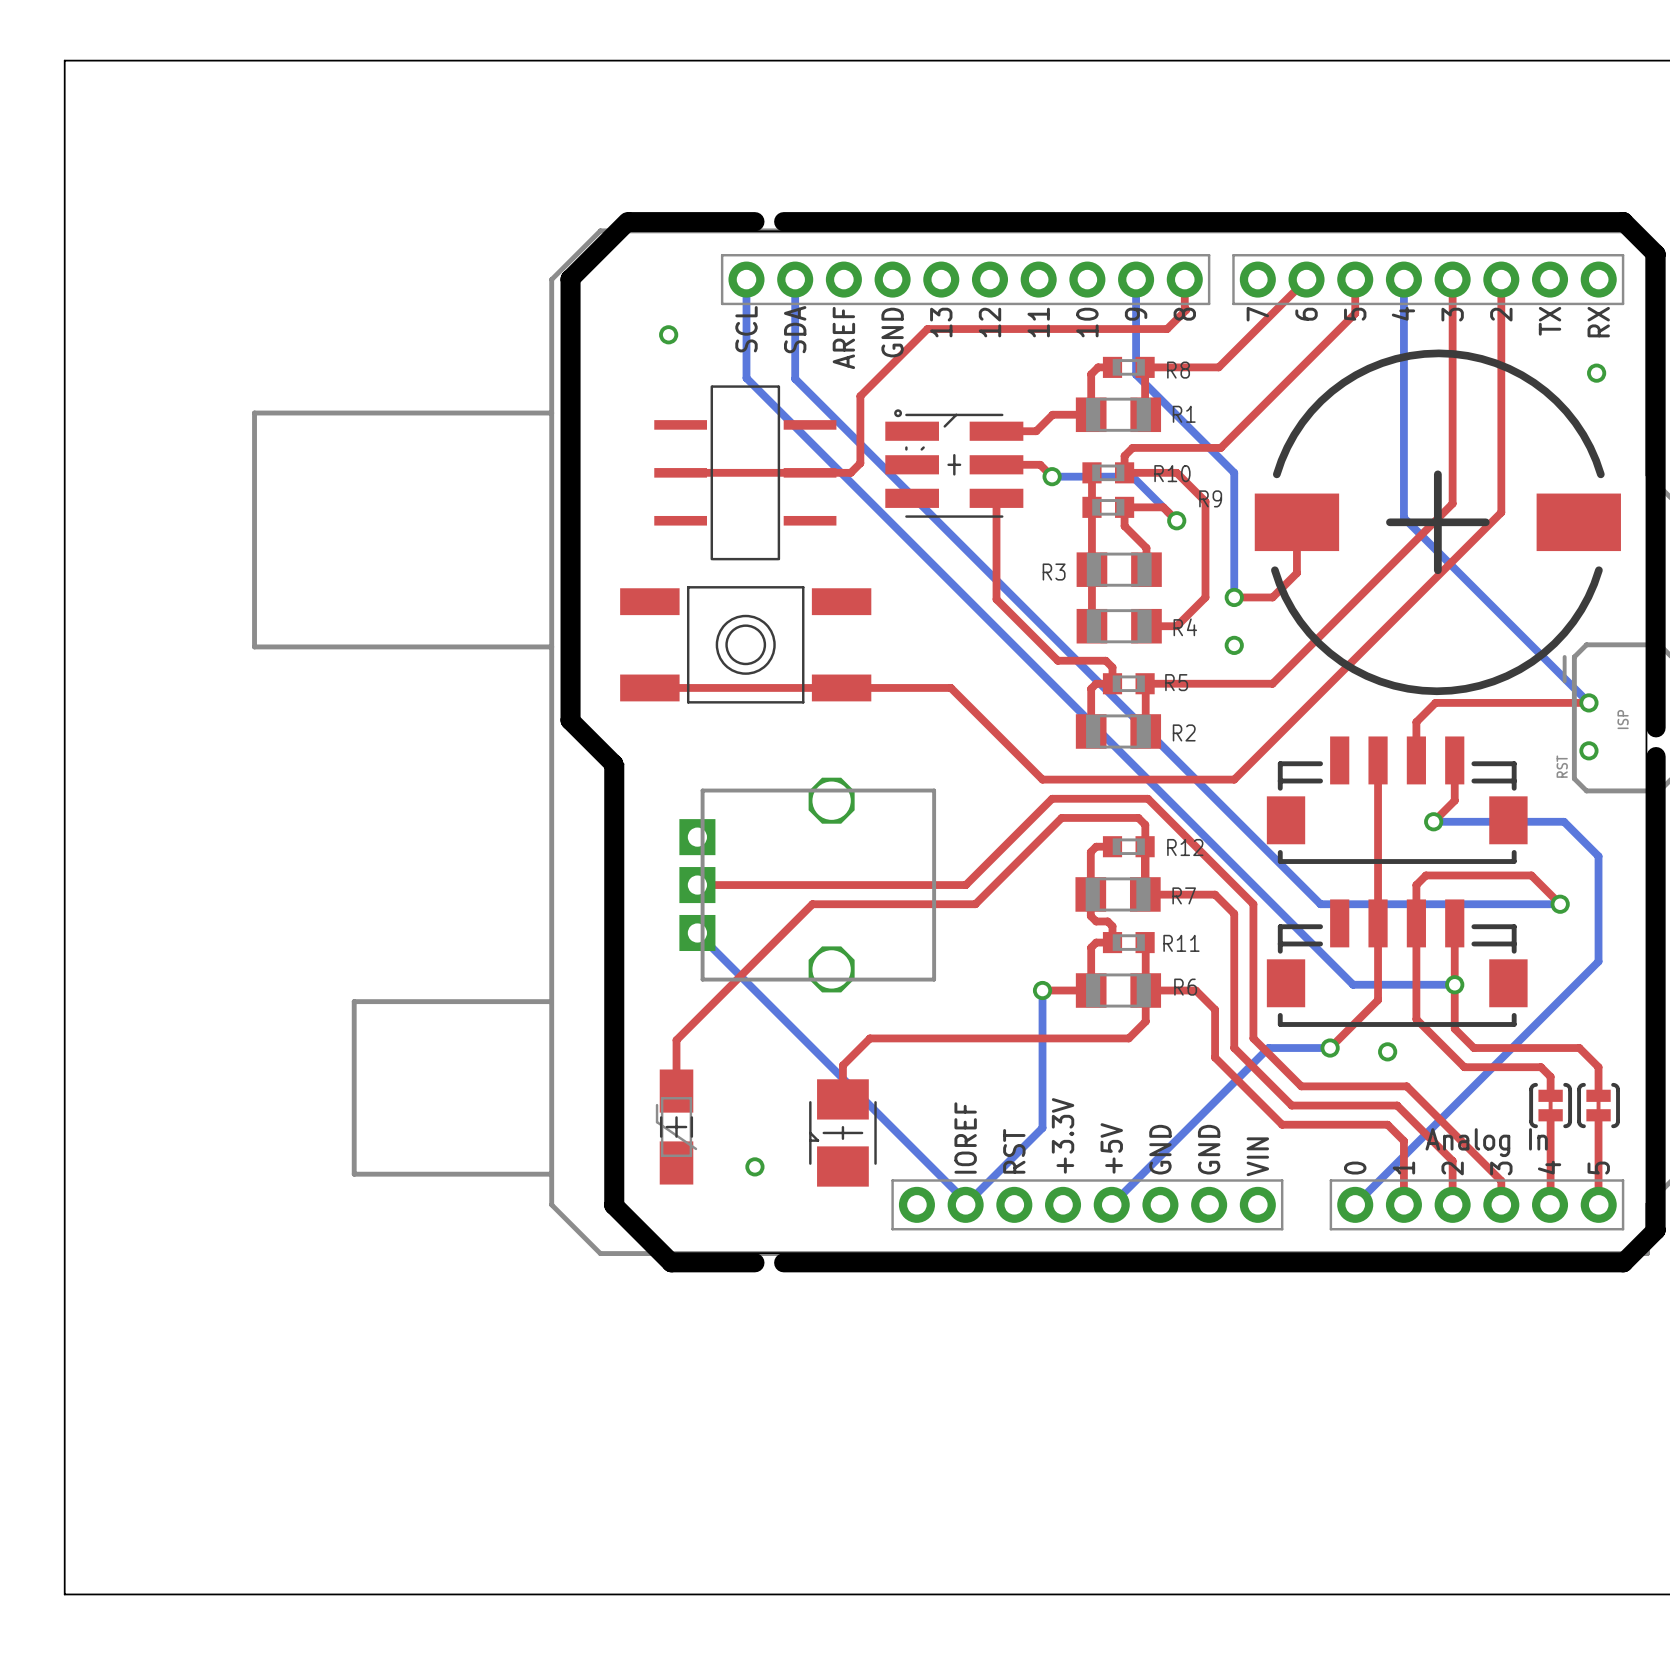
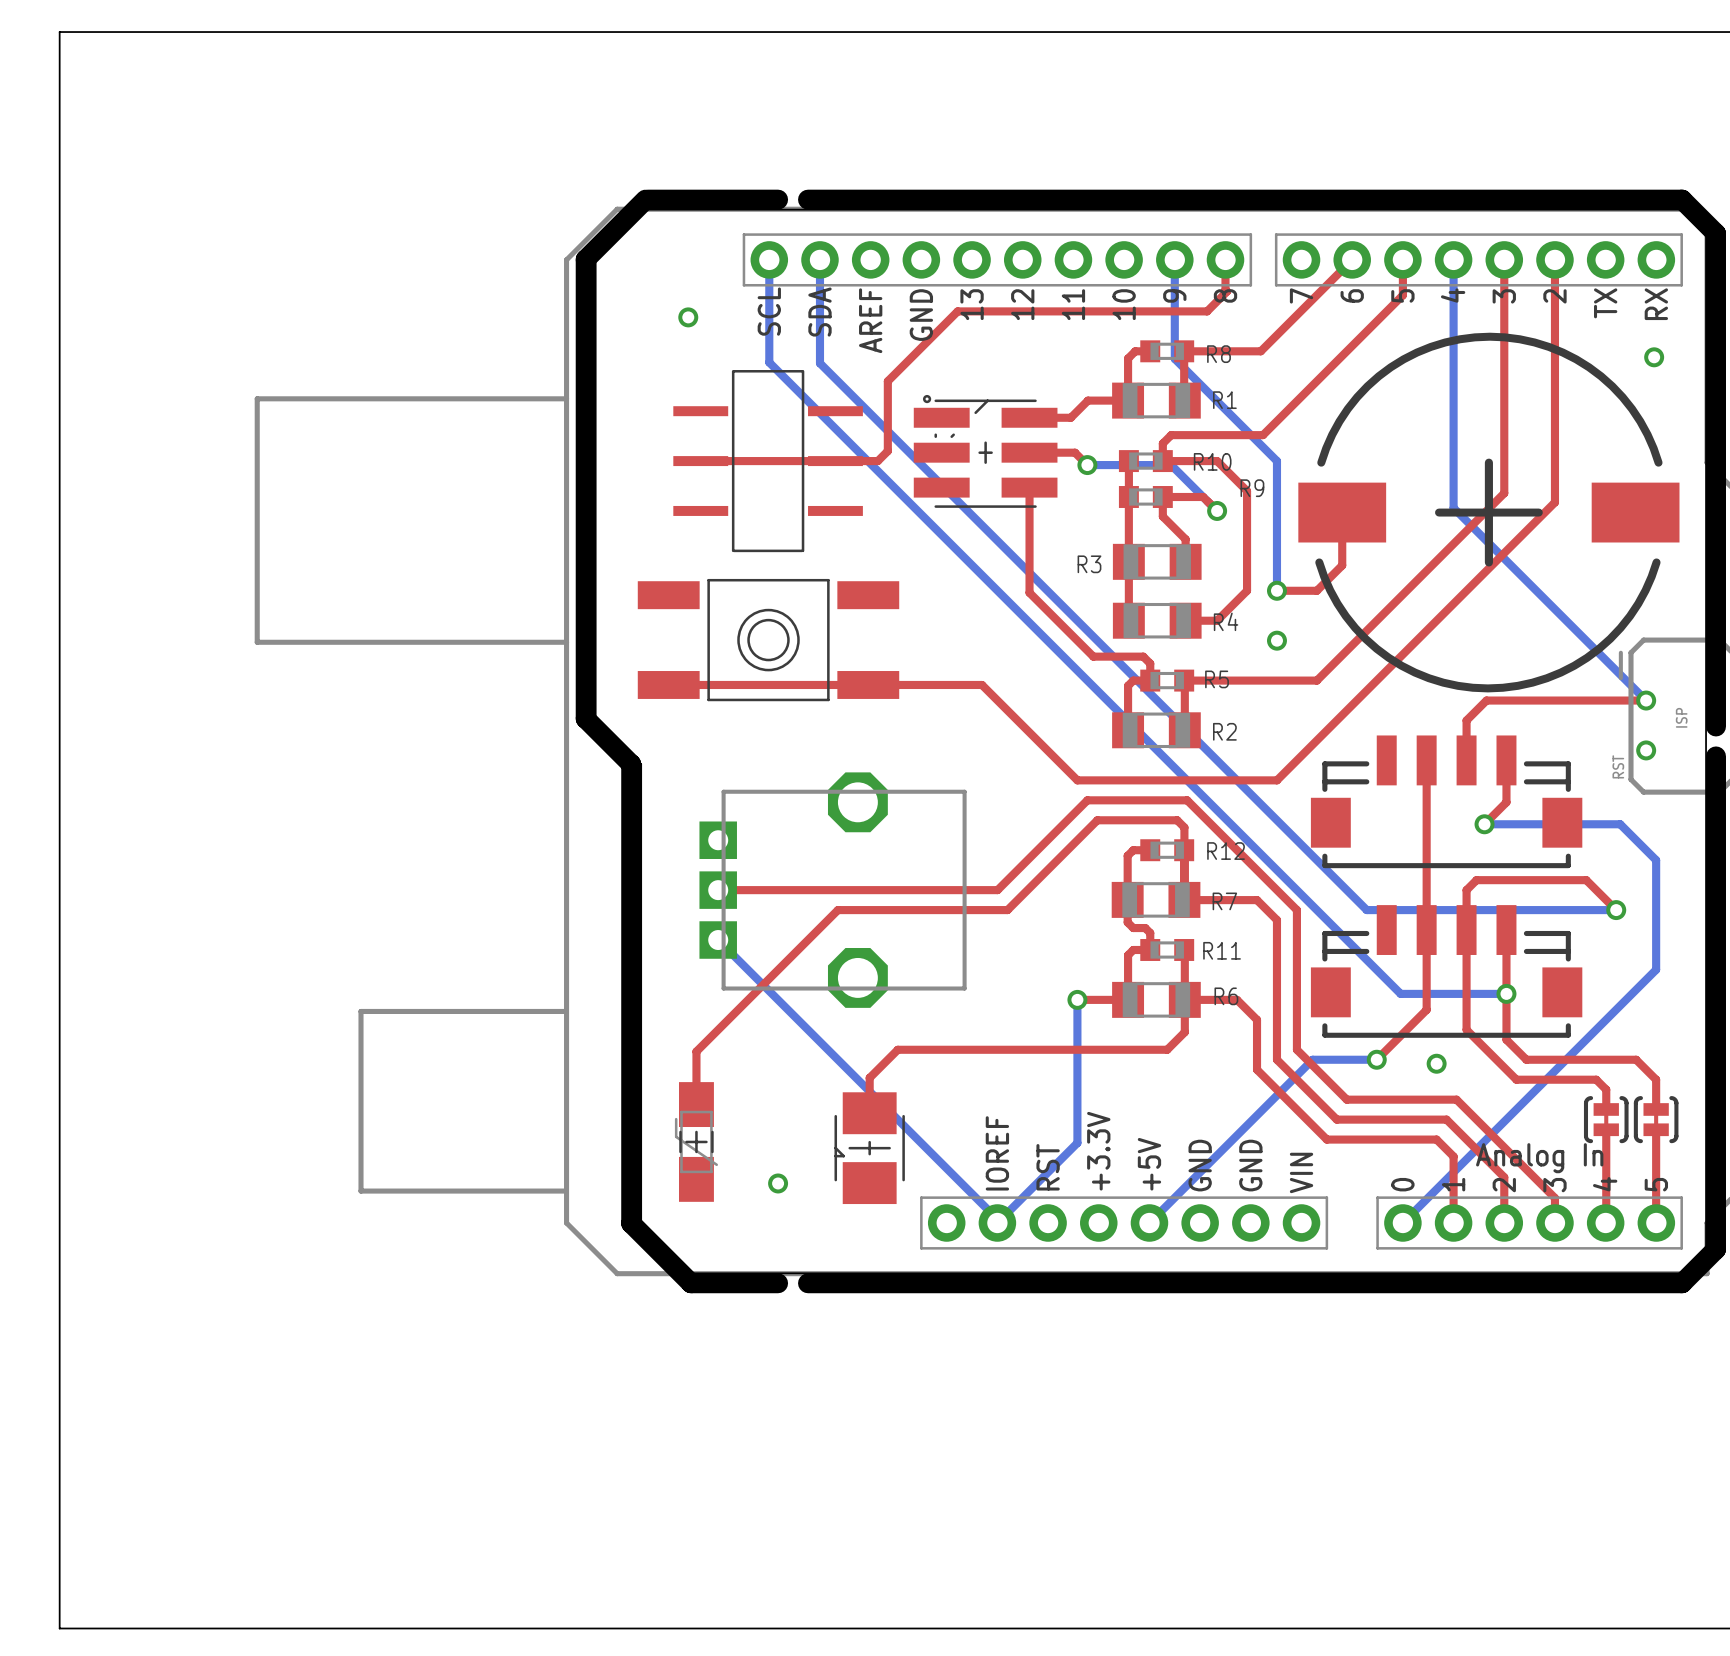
part footprint: [679, 777, 937, 993] -> [699, 772, 967, 1008]

